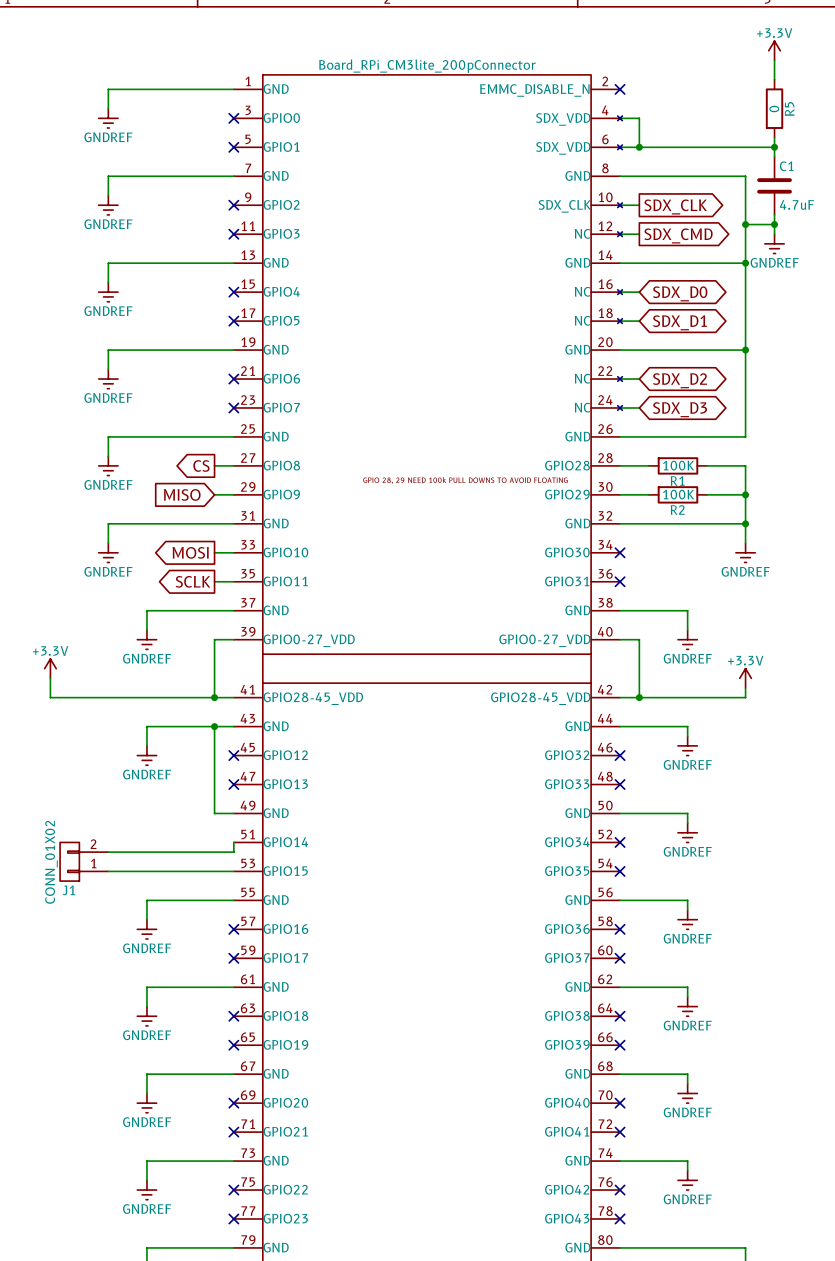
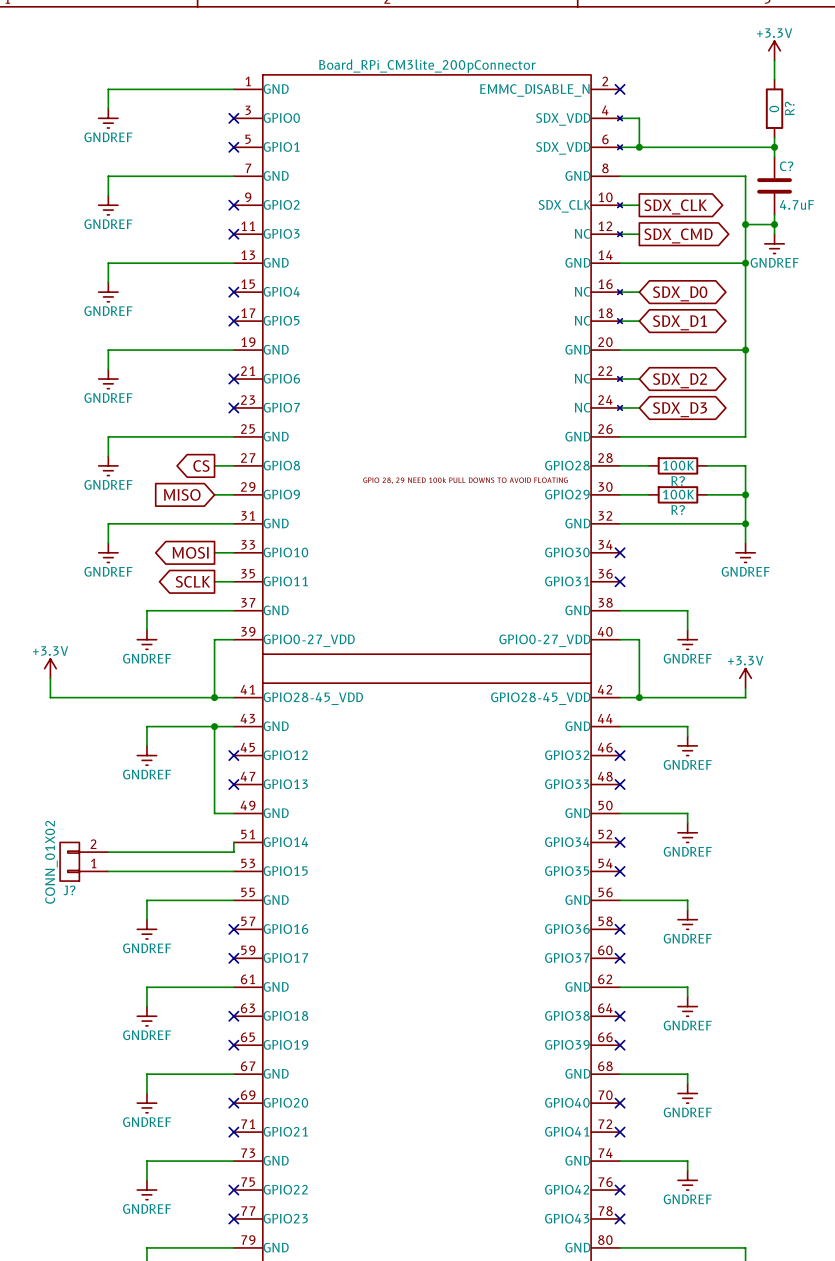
R5 name: R5 (789, 108) -> R? (789, 108)
C1 name: C1 (786, 166) -> C? (786, 166)
R1 name: R1 (677, 481) -> R? (678, 481)
R2 name: R2 (677, 509) -> R? (678, 510)
J1 name: J1 (68, 890) -> J? (69, 890)

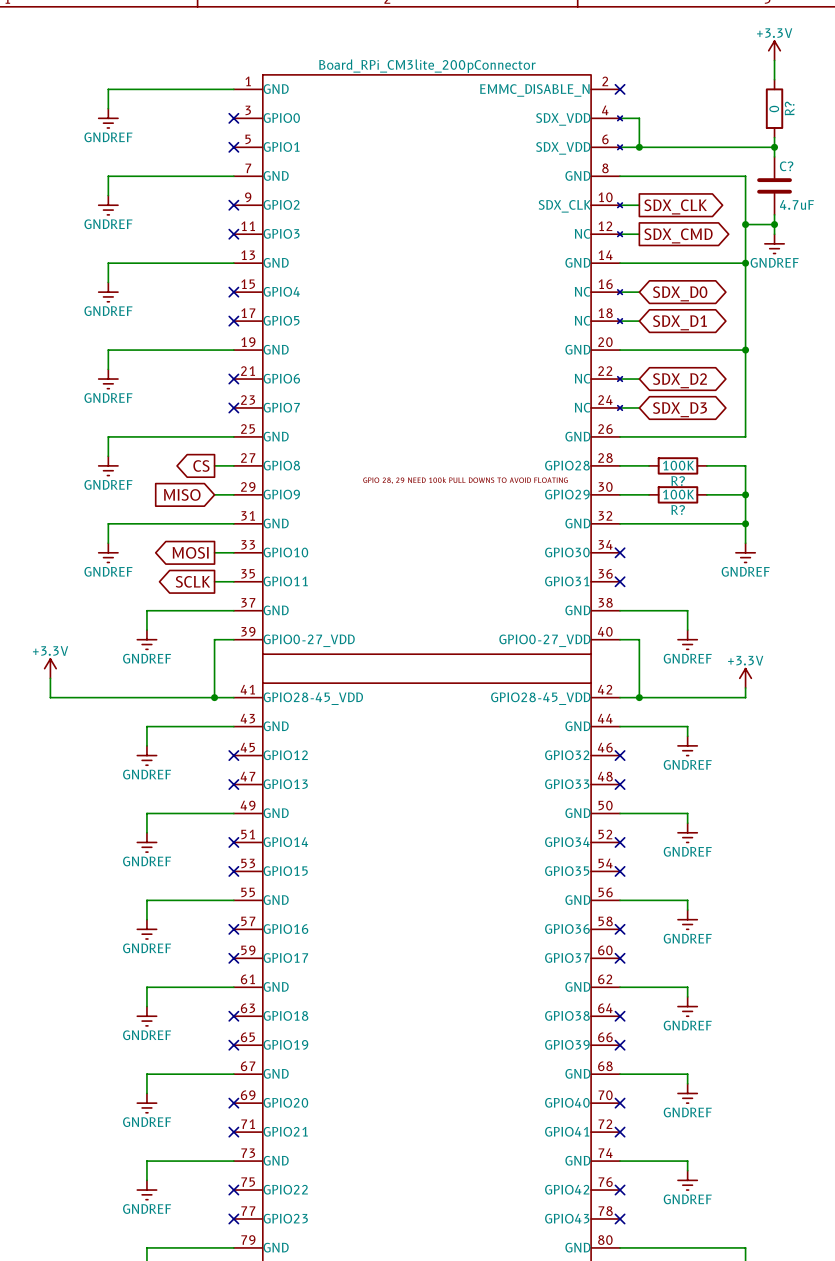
wire: (214, 726) (214, 813) -> (146, 832) (146, 813) (214, 813)
junction: (214, 726) -> none
power symbol: none -> GNDREF (146, 842)
wire: (233, 842) (233, 852) (108, 852) -> none
no-connect mark: none -> (233, 842)
J?: CONN_01X02 (84, 861) -> none
wire: (108, 871) (233, 871) -> none
no-connect mark: none -> (233, 871)

